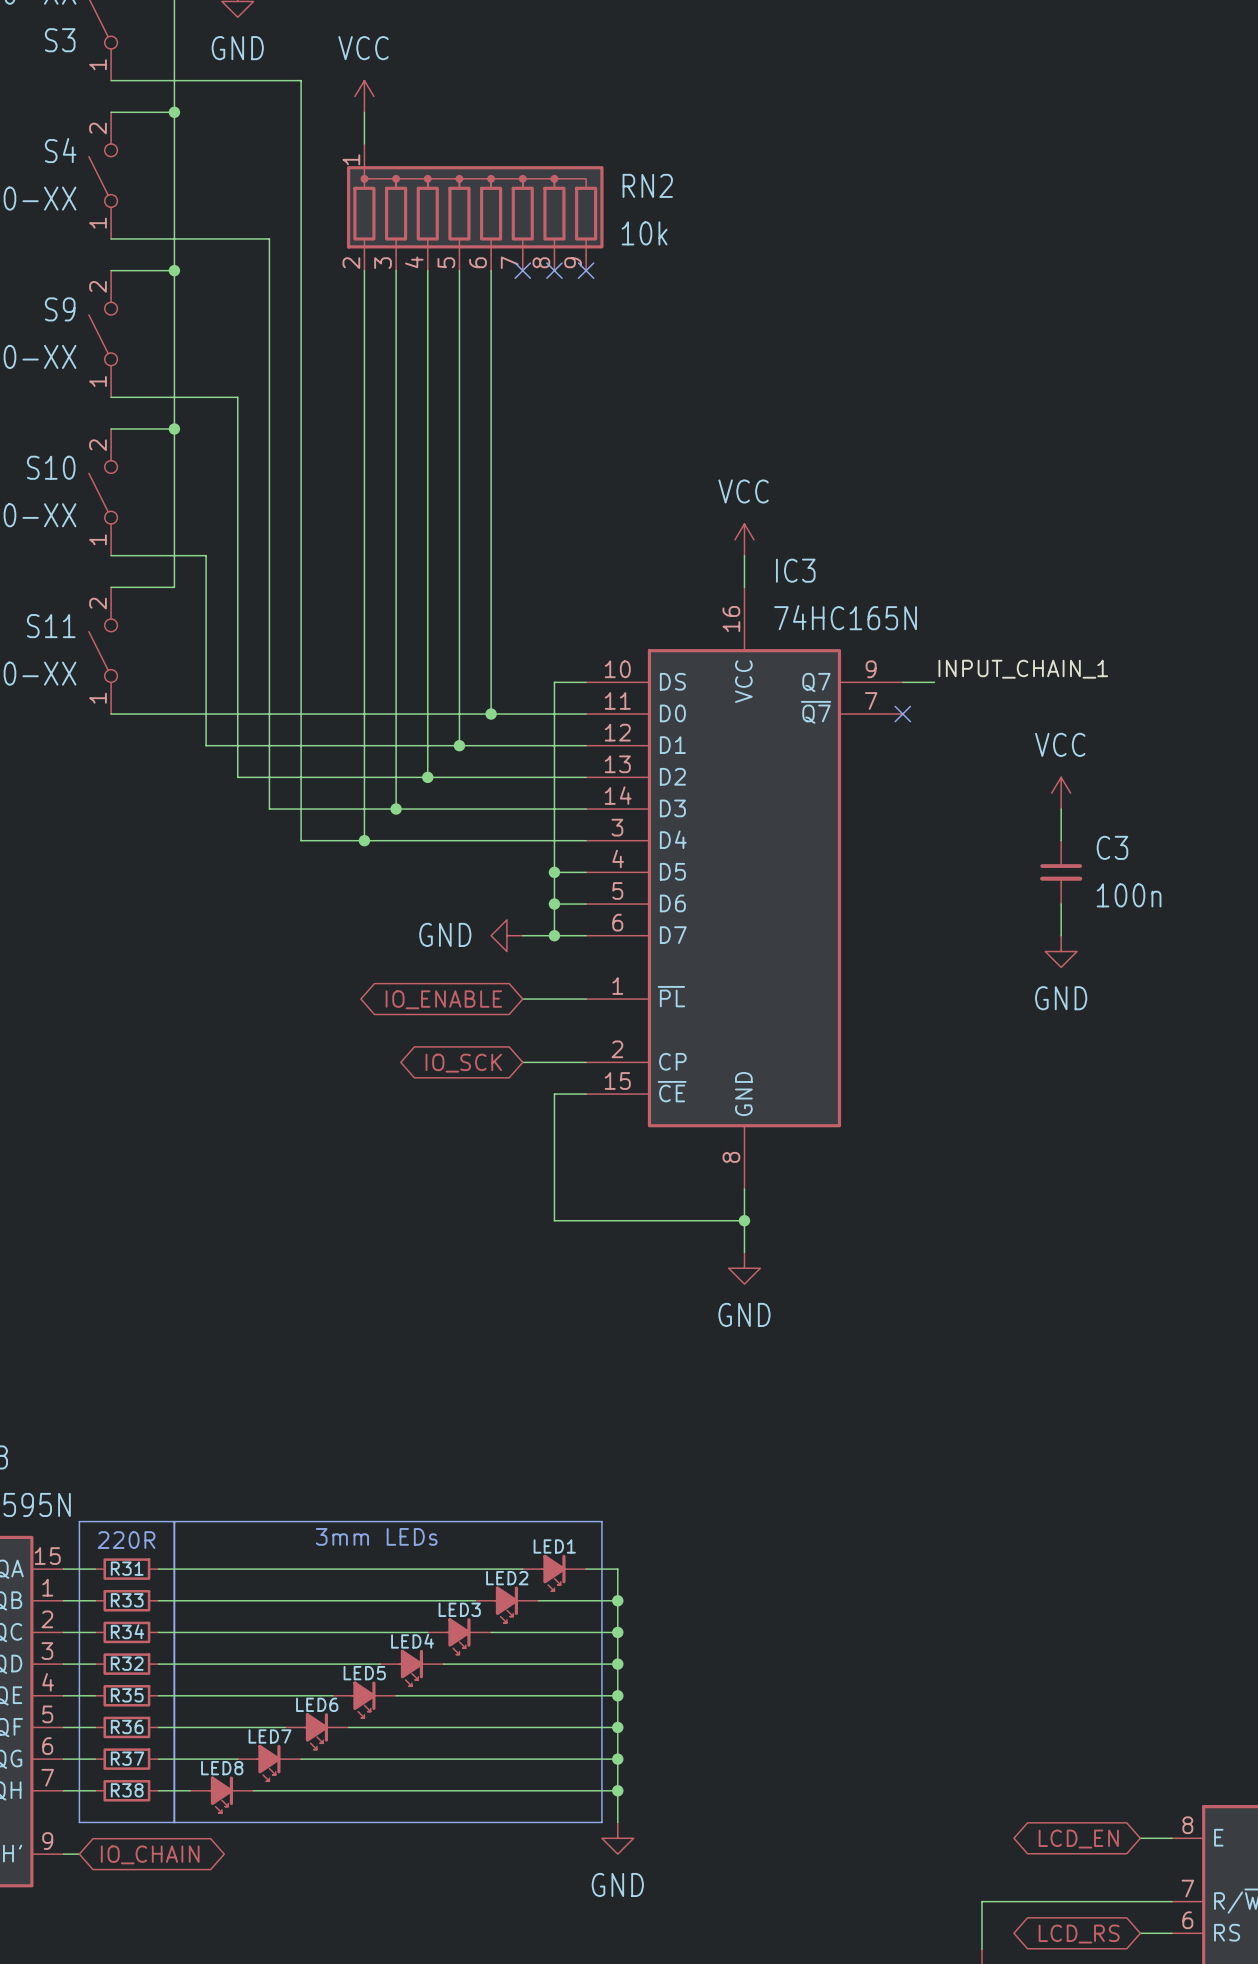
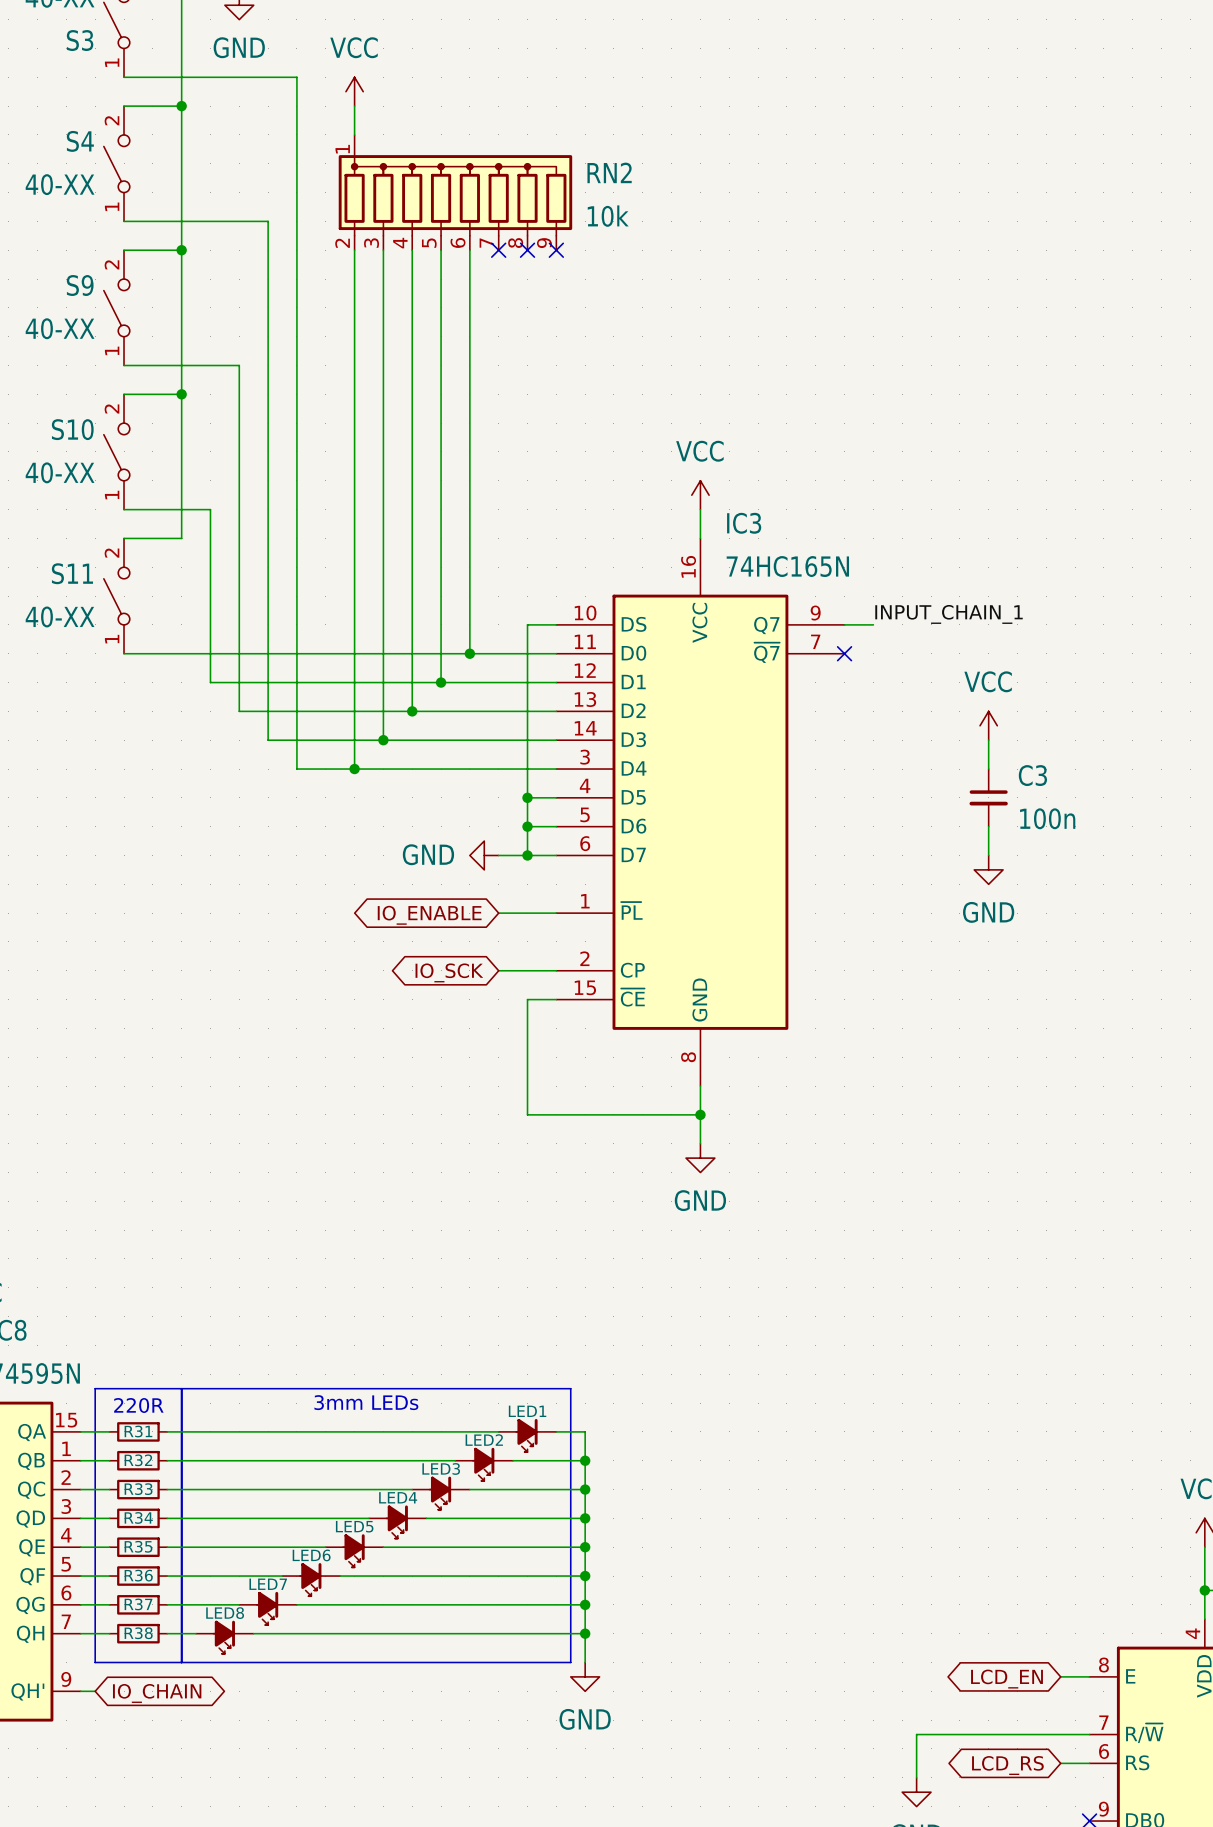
R33 name: R33 (127, 1600) -> R32 (138, 1460)
R34 name: R34 (127, 1631) -> R33 (138, 1489)
R32 name: R32 (127, 1663) -> R34 (138, 1517)

